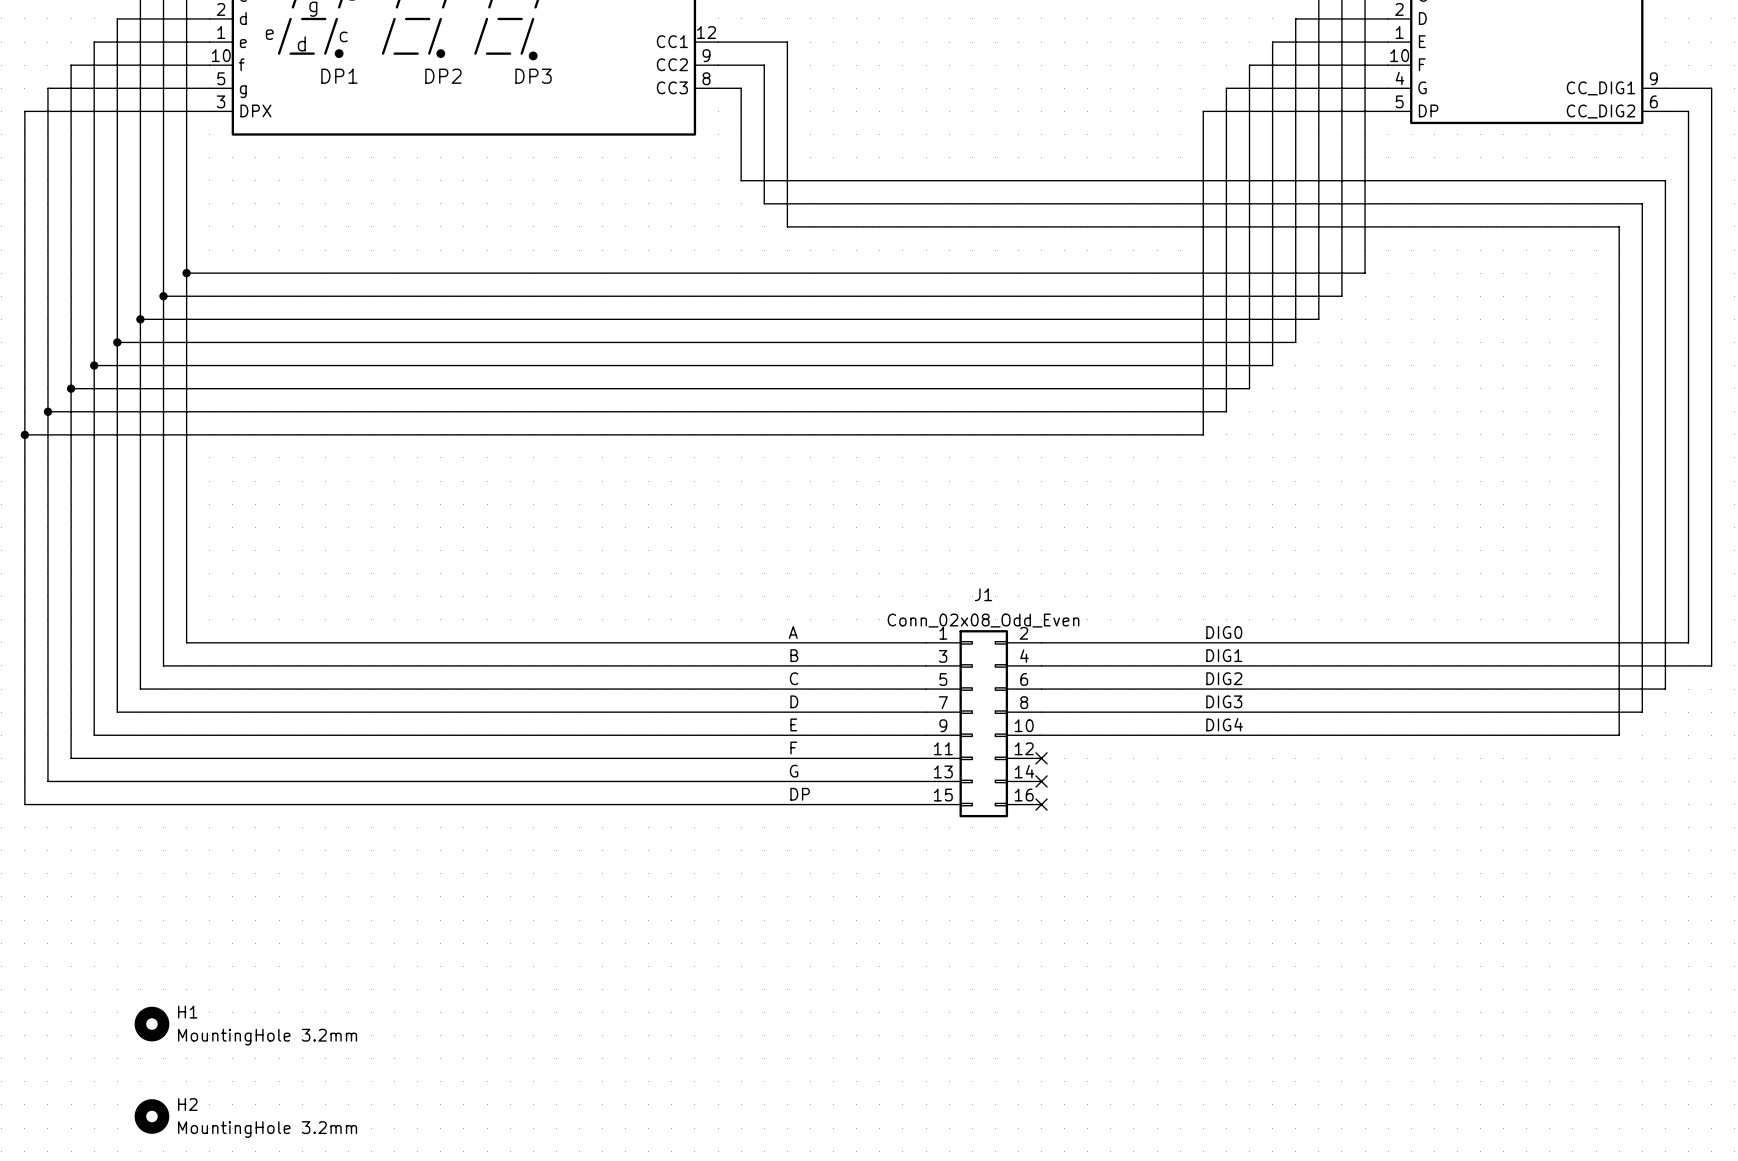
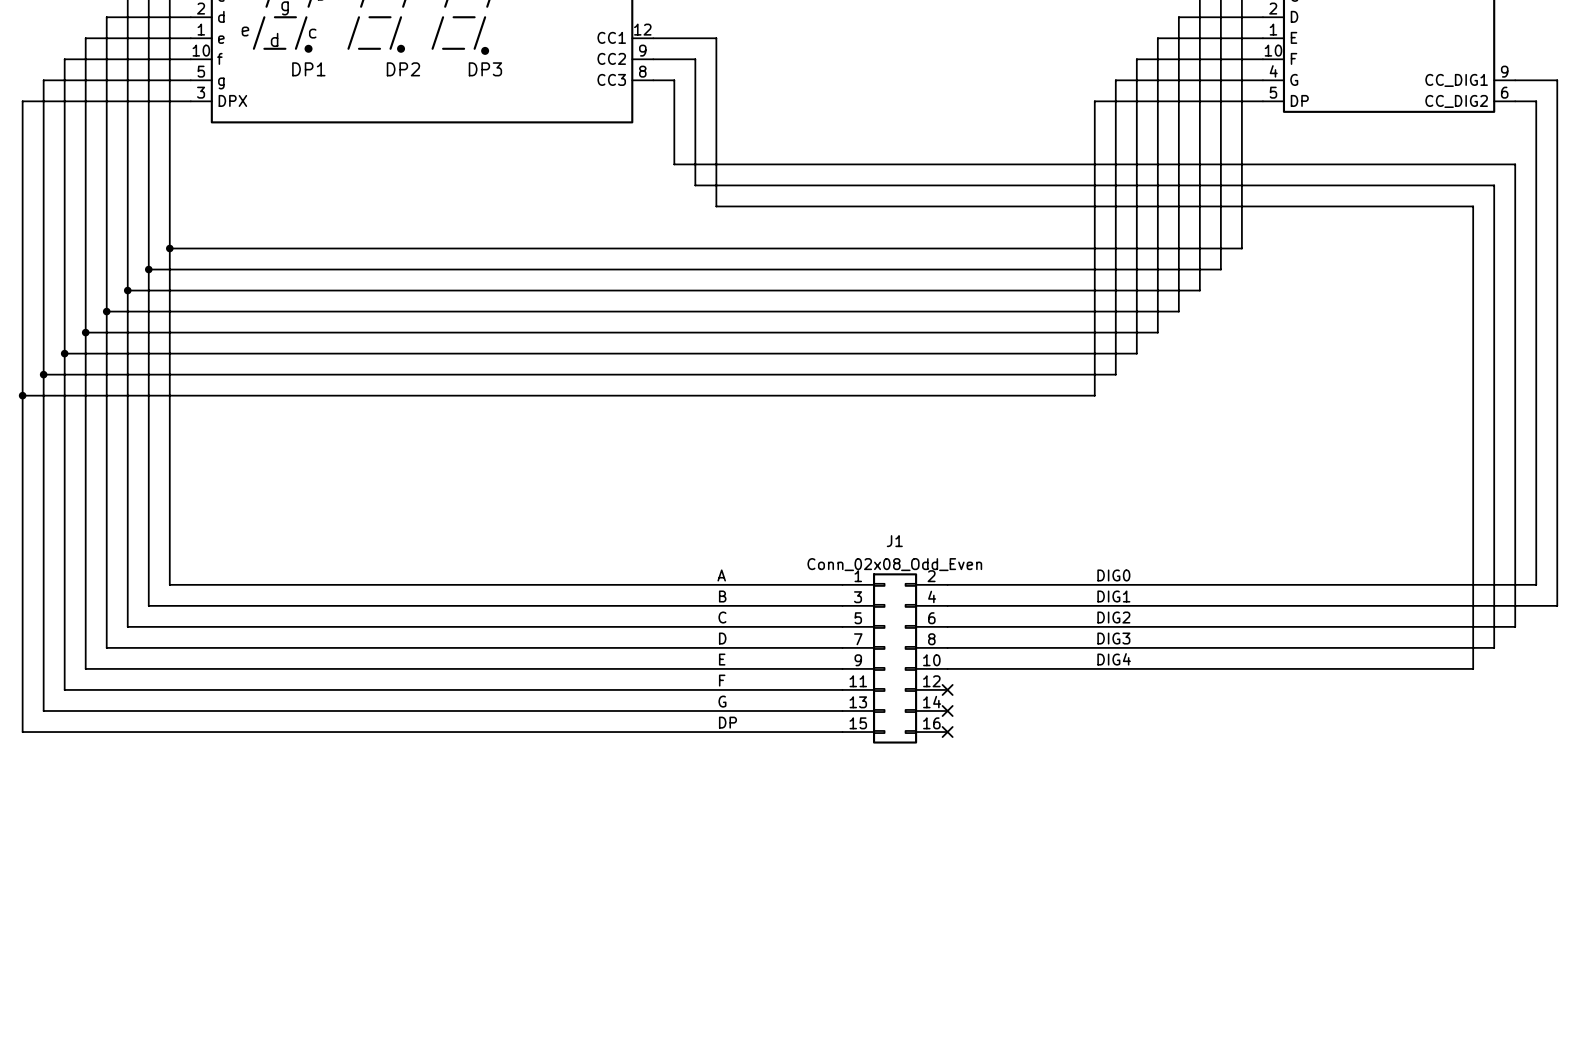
H1: MountingHole 3.2mm (151, 1024) -> none
H2: MountingHole 3.2mm (151, 1116) -> none

